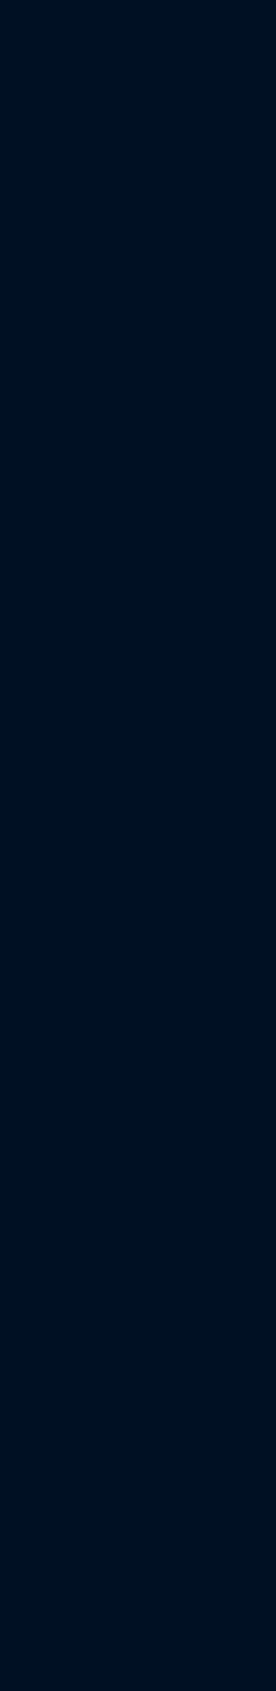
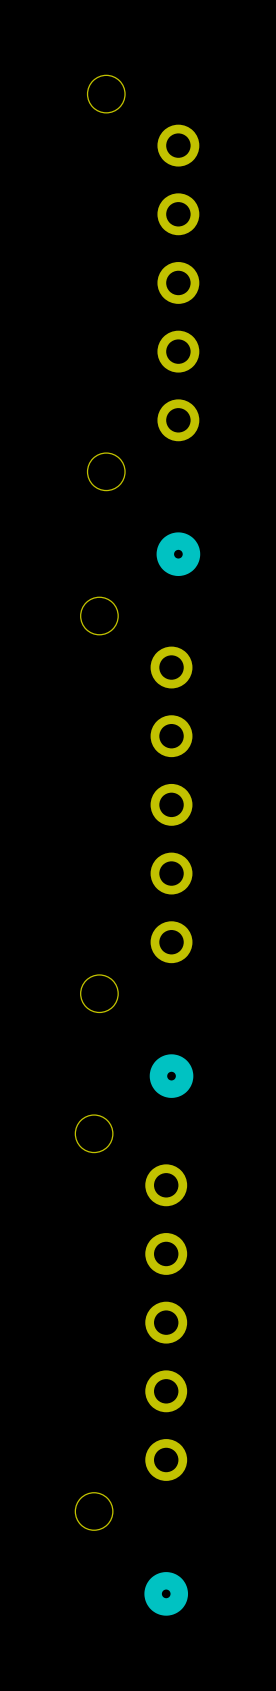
part: none -> (143, 325)
part: none -> (137, 847)
part: none -> (131, 1365)

